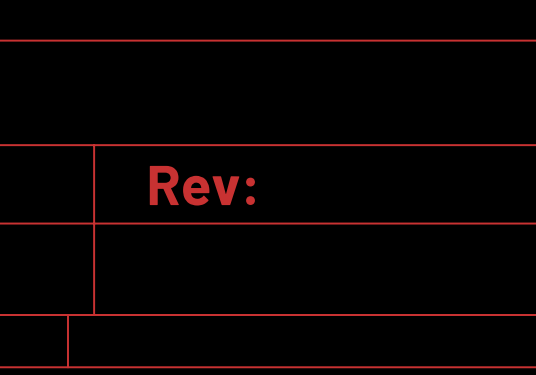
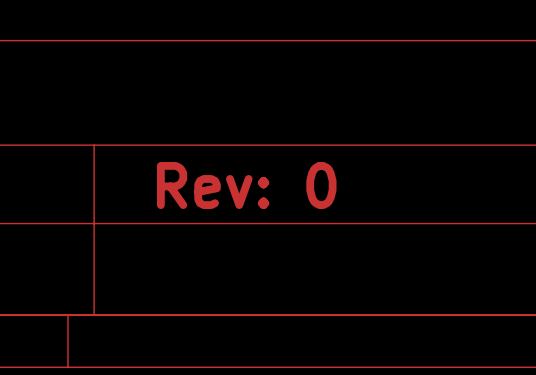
title block: Rev: (202, 185) -> Rev: 0 (246, 185)

